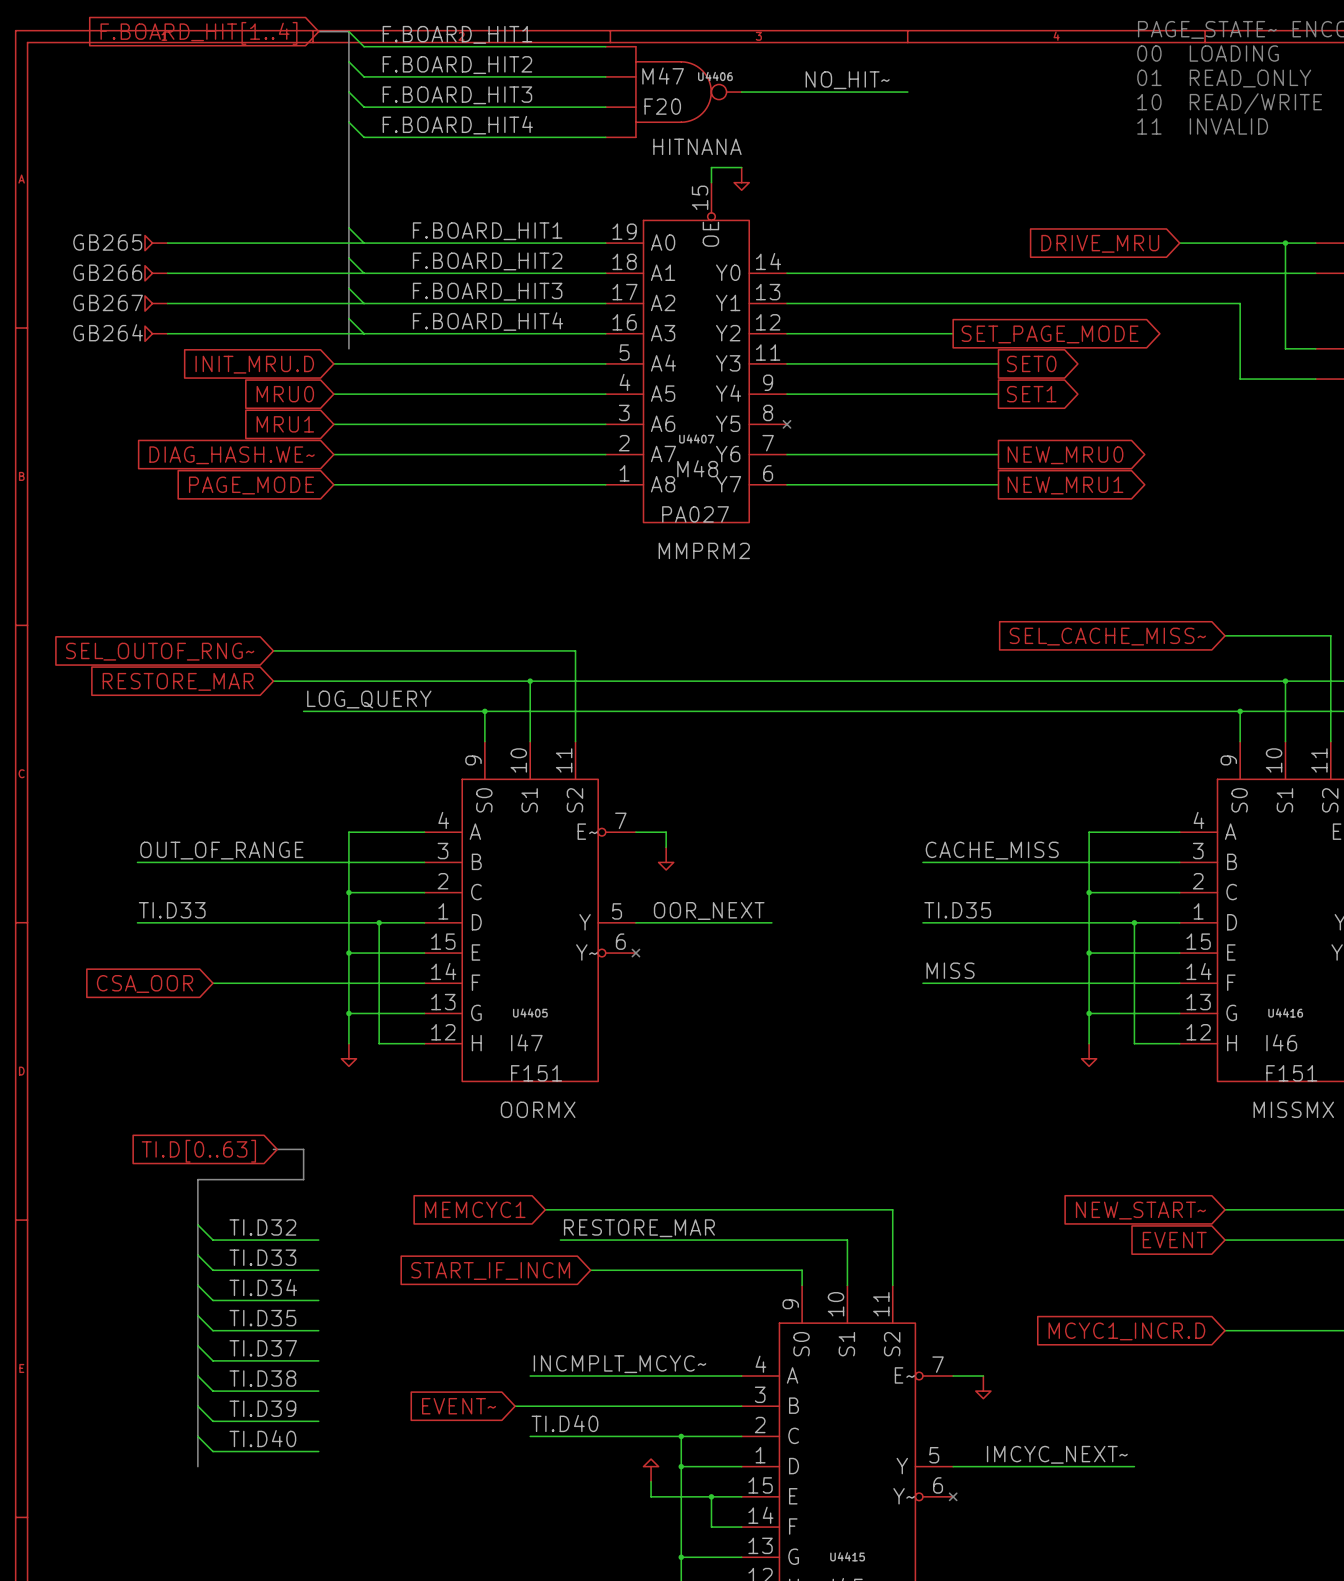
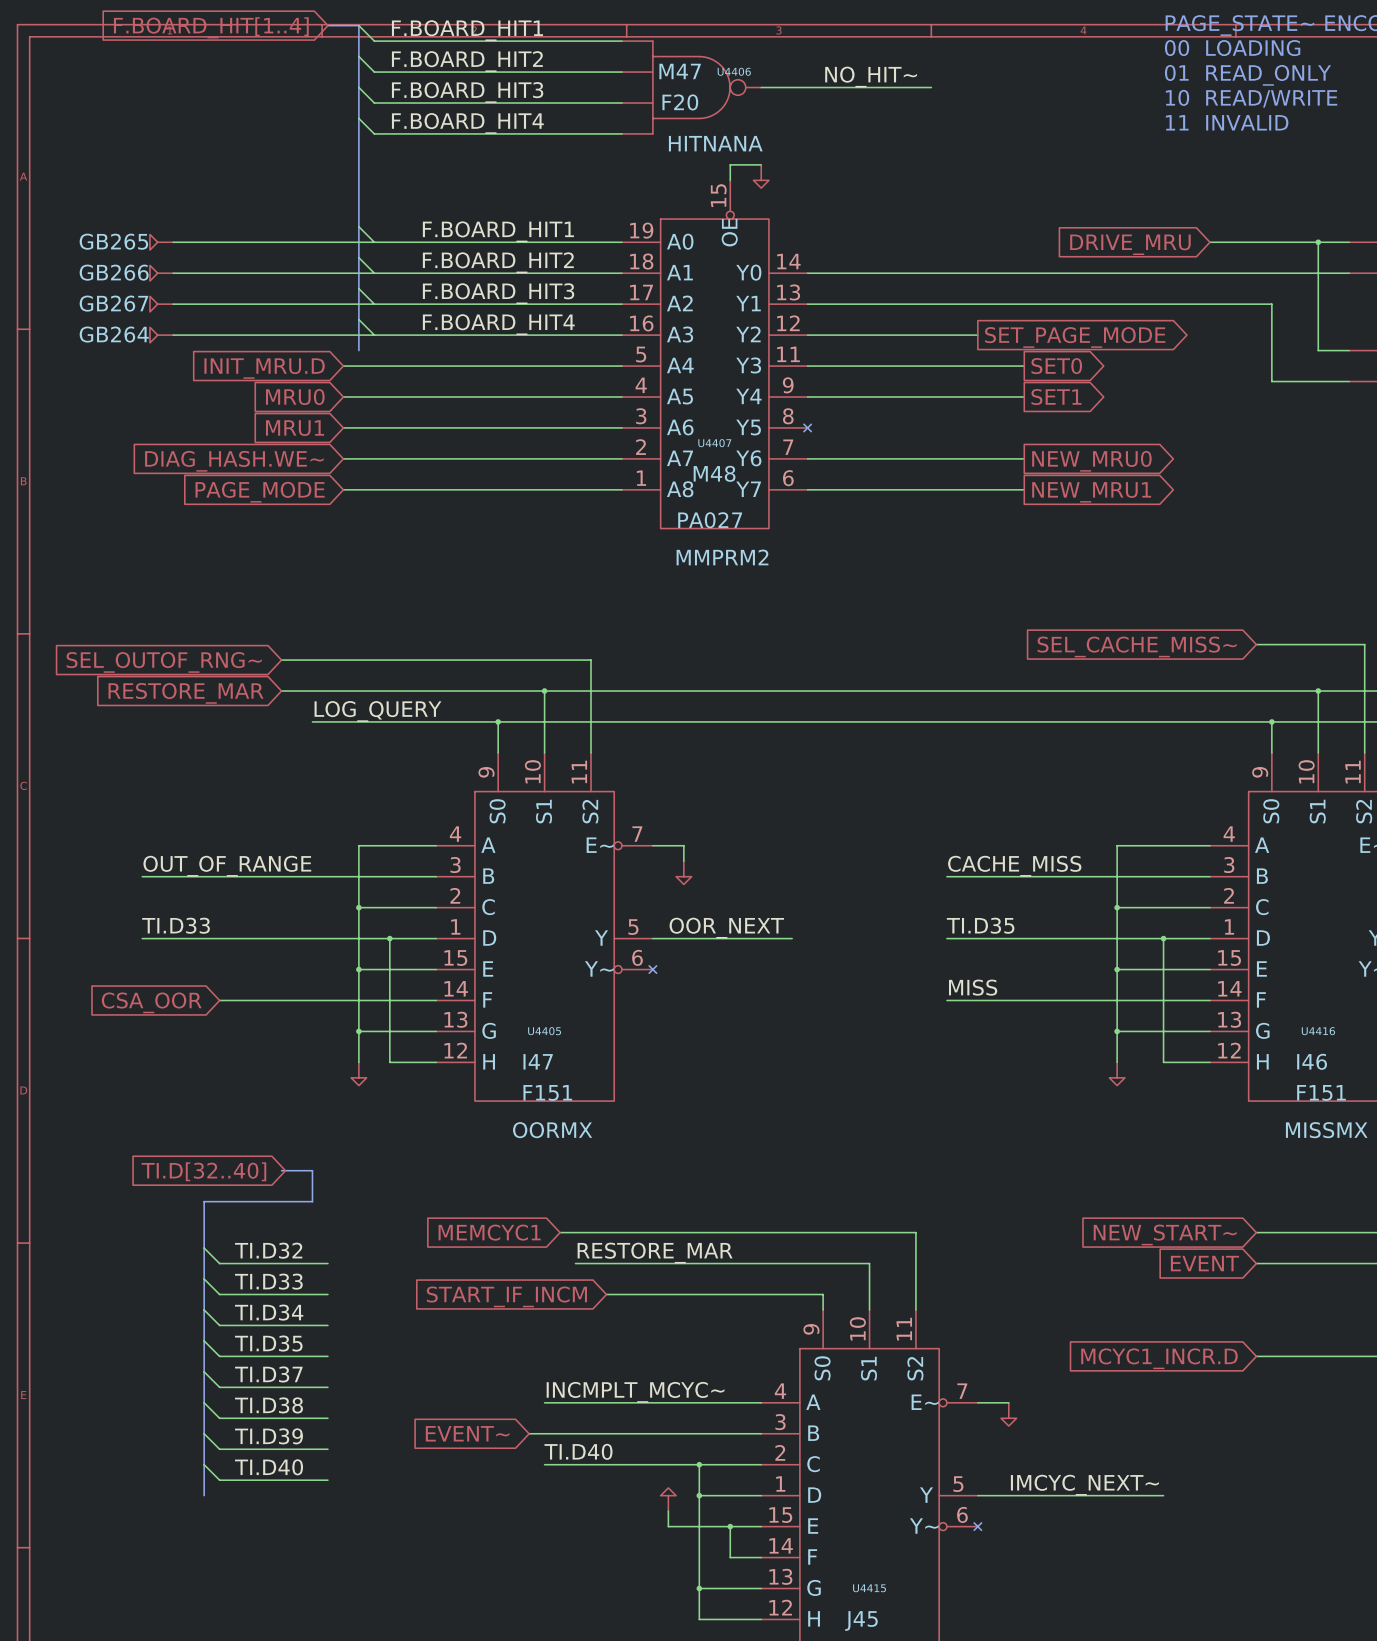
global label: TI.D[0..63] (198, 1151) -> TI.D[32..40] (203, 1171)

